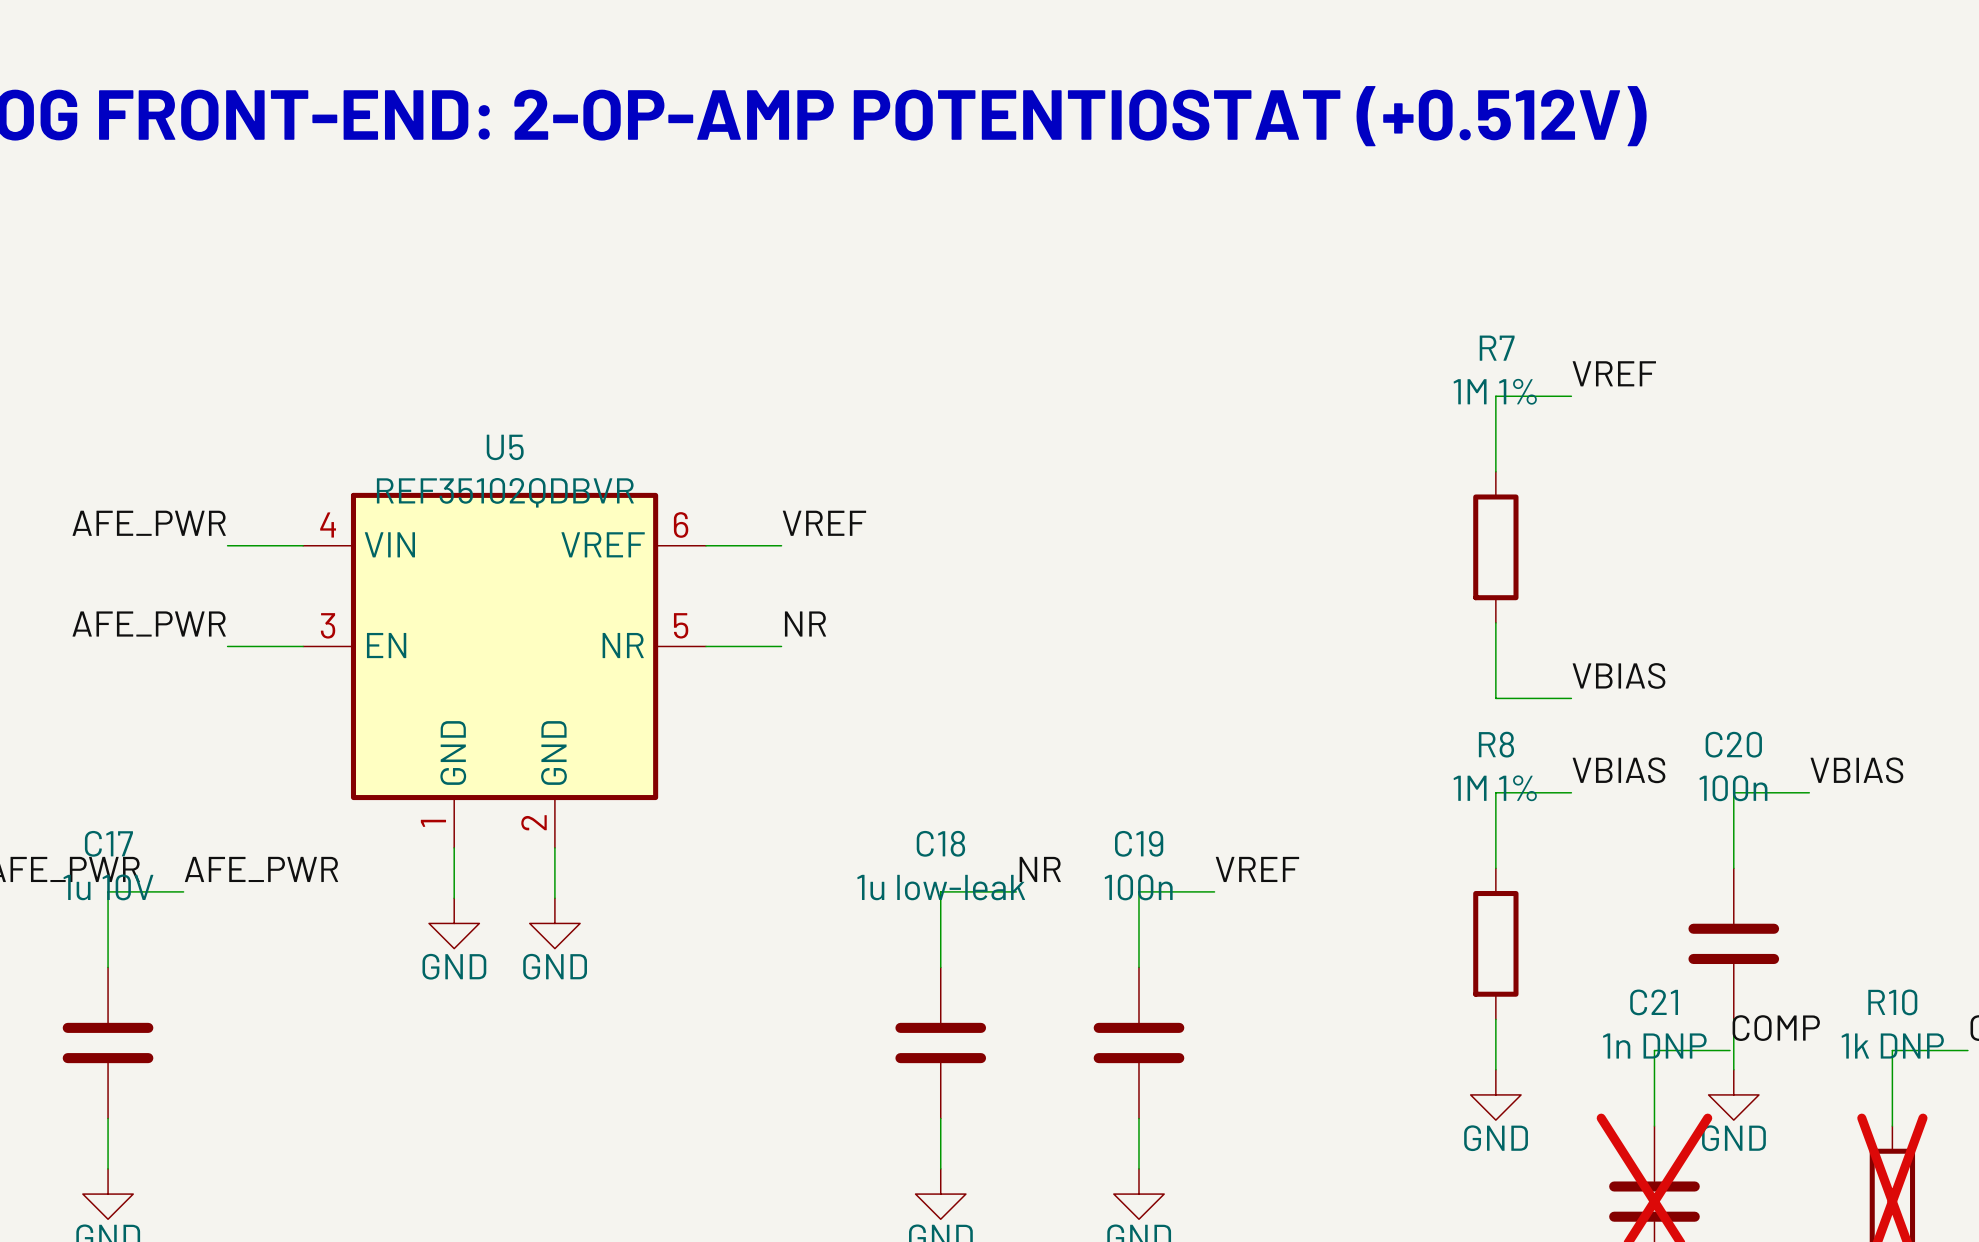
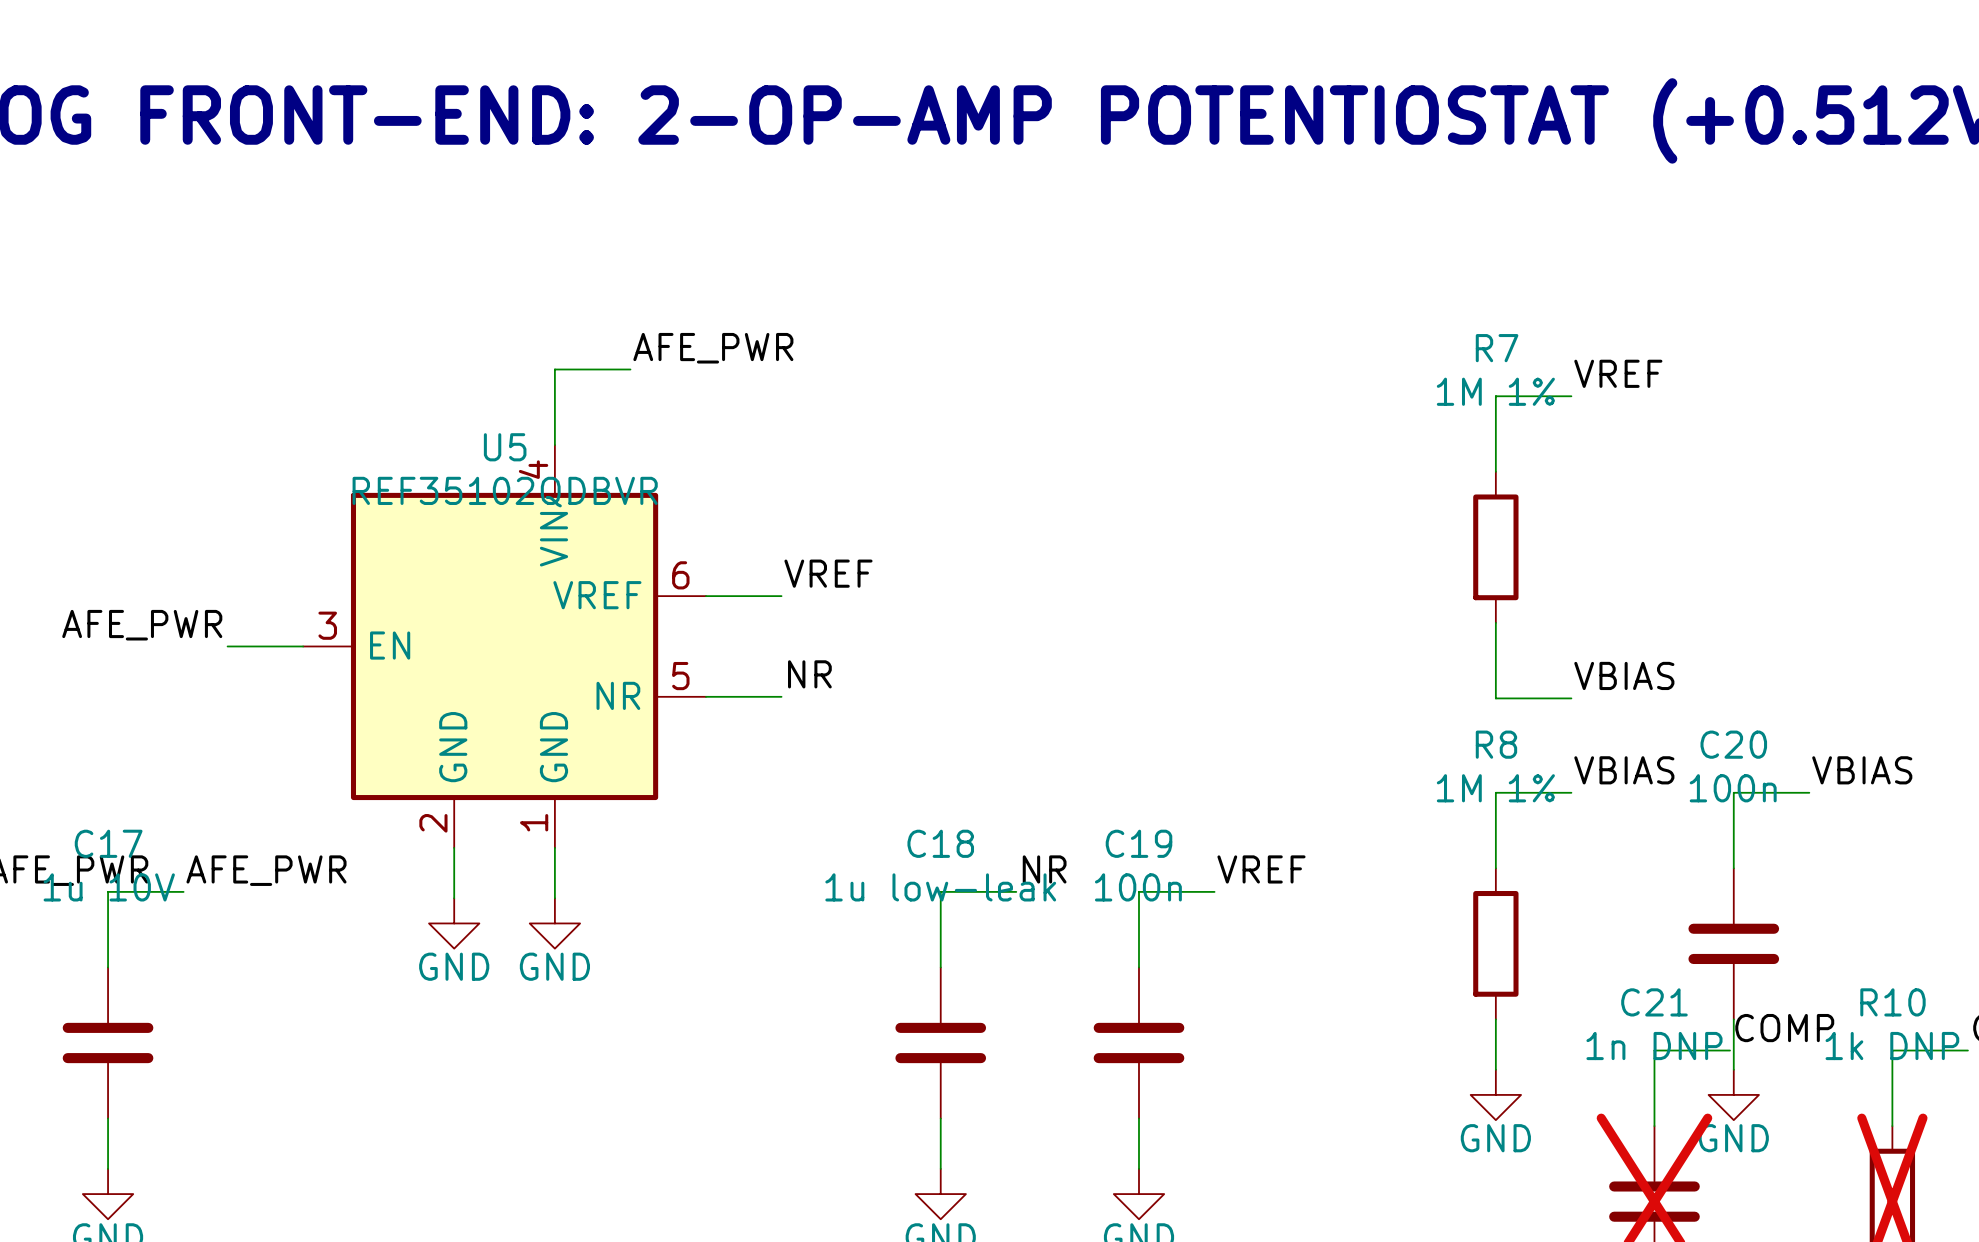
wire: none -> (630, 369) (554, 369) (554, 445)
U5 symbol: [303, 492, 706, 848] -> [303, 445, 706, 848]
label position: AFE_PWR (149, 523) -> AFE_PWR (713, 348)
label position: VREF (824, 523) -> VREF (828, 573)
wire: (227, 545) (303, 545) -> none
wire: (705, 545) (781, 545) -> (705, 596) (781, 596)
label position: NR (805, 624) -> NR (809, 674)
wire: (705, 646) (781, 646) -> (705, 696) (781, 696)

